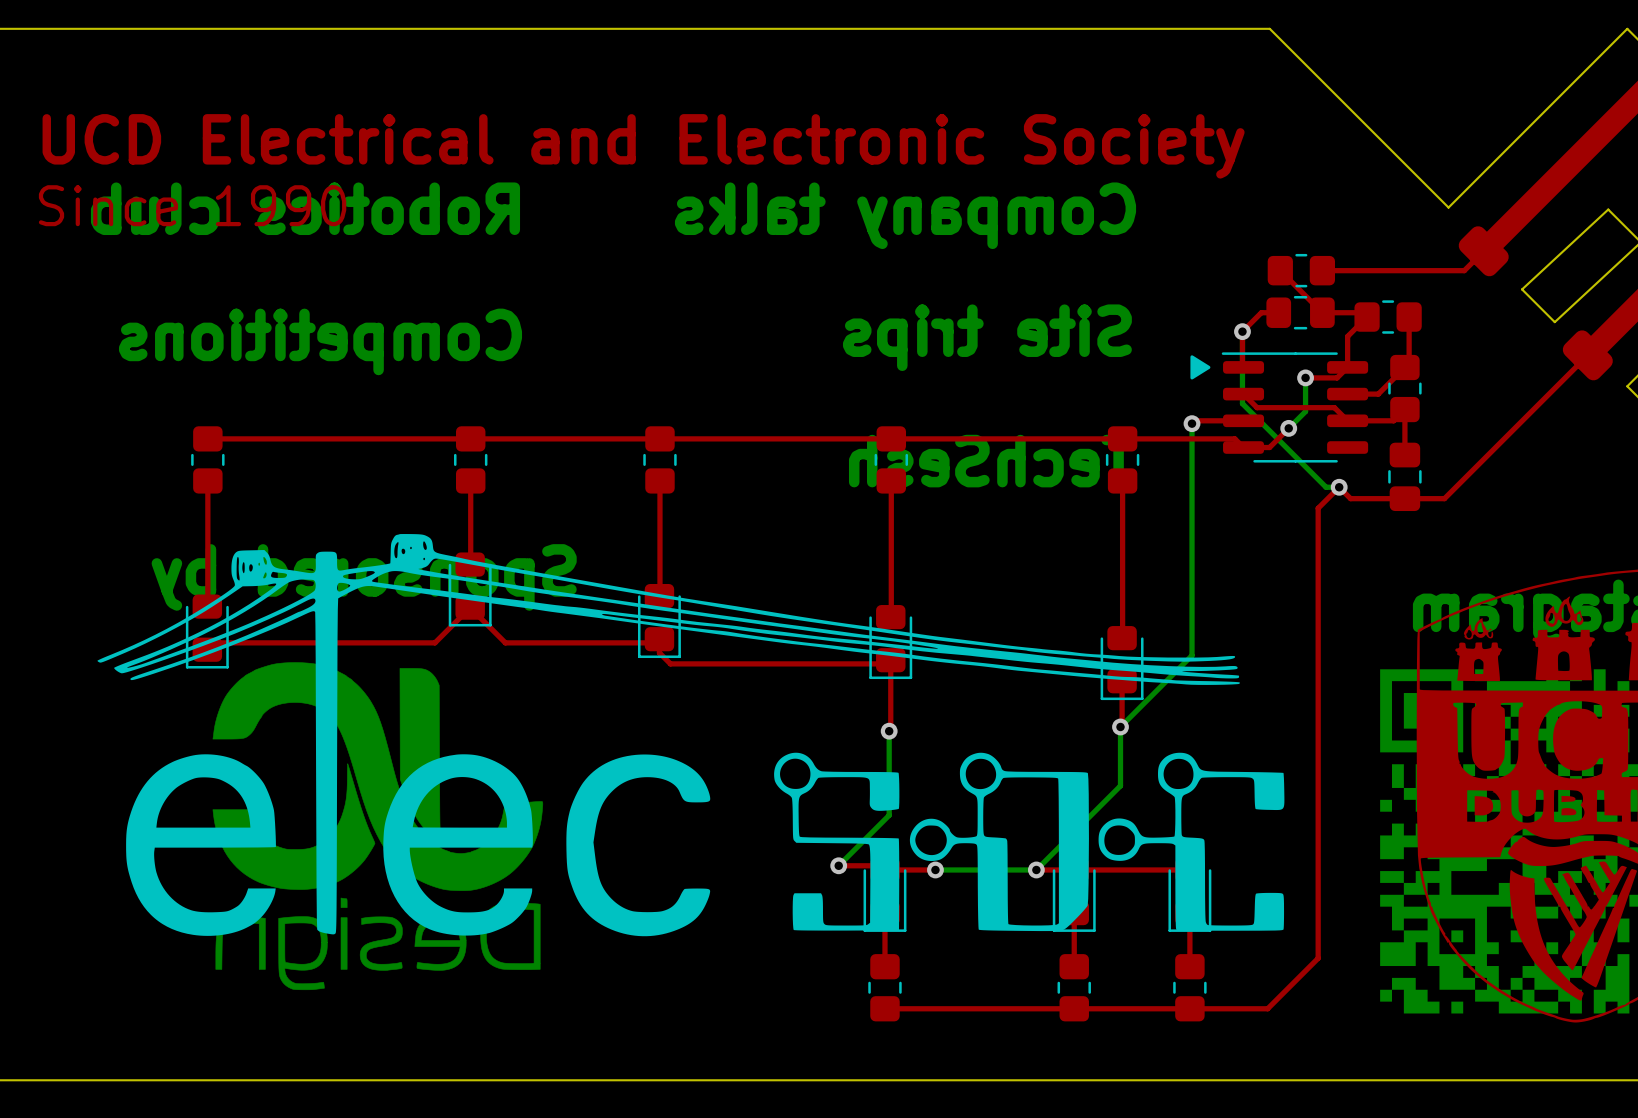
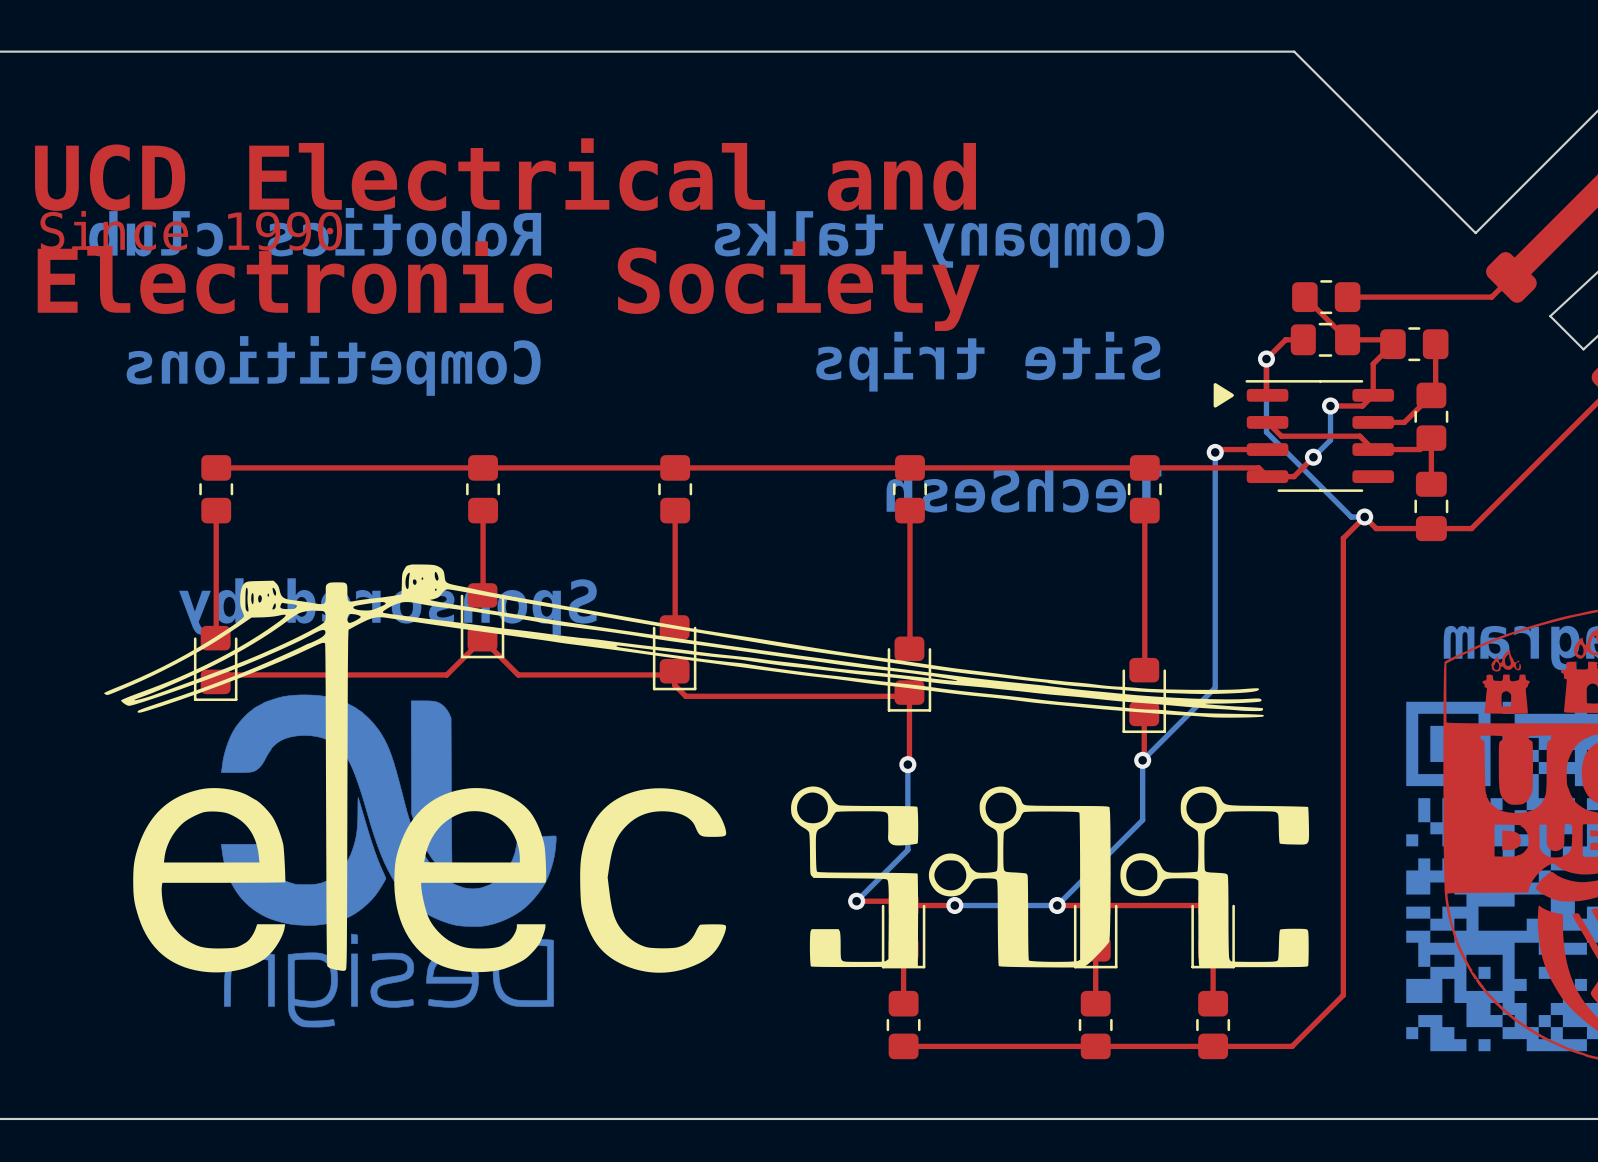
text: UCD Electrical and Electronic Society (643, 146) -> UCD Electrical and (505, 174)
text: none -> Electronic Society (508, 286)

